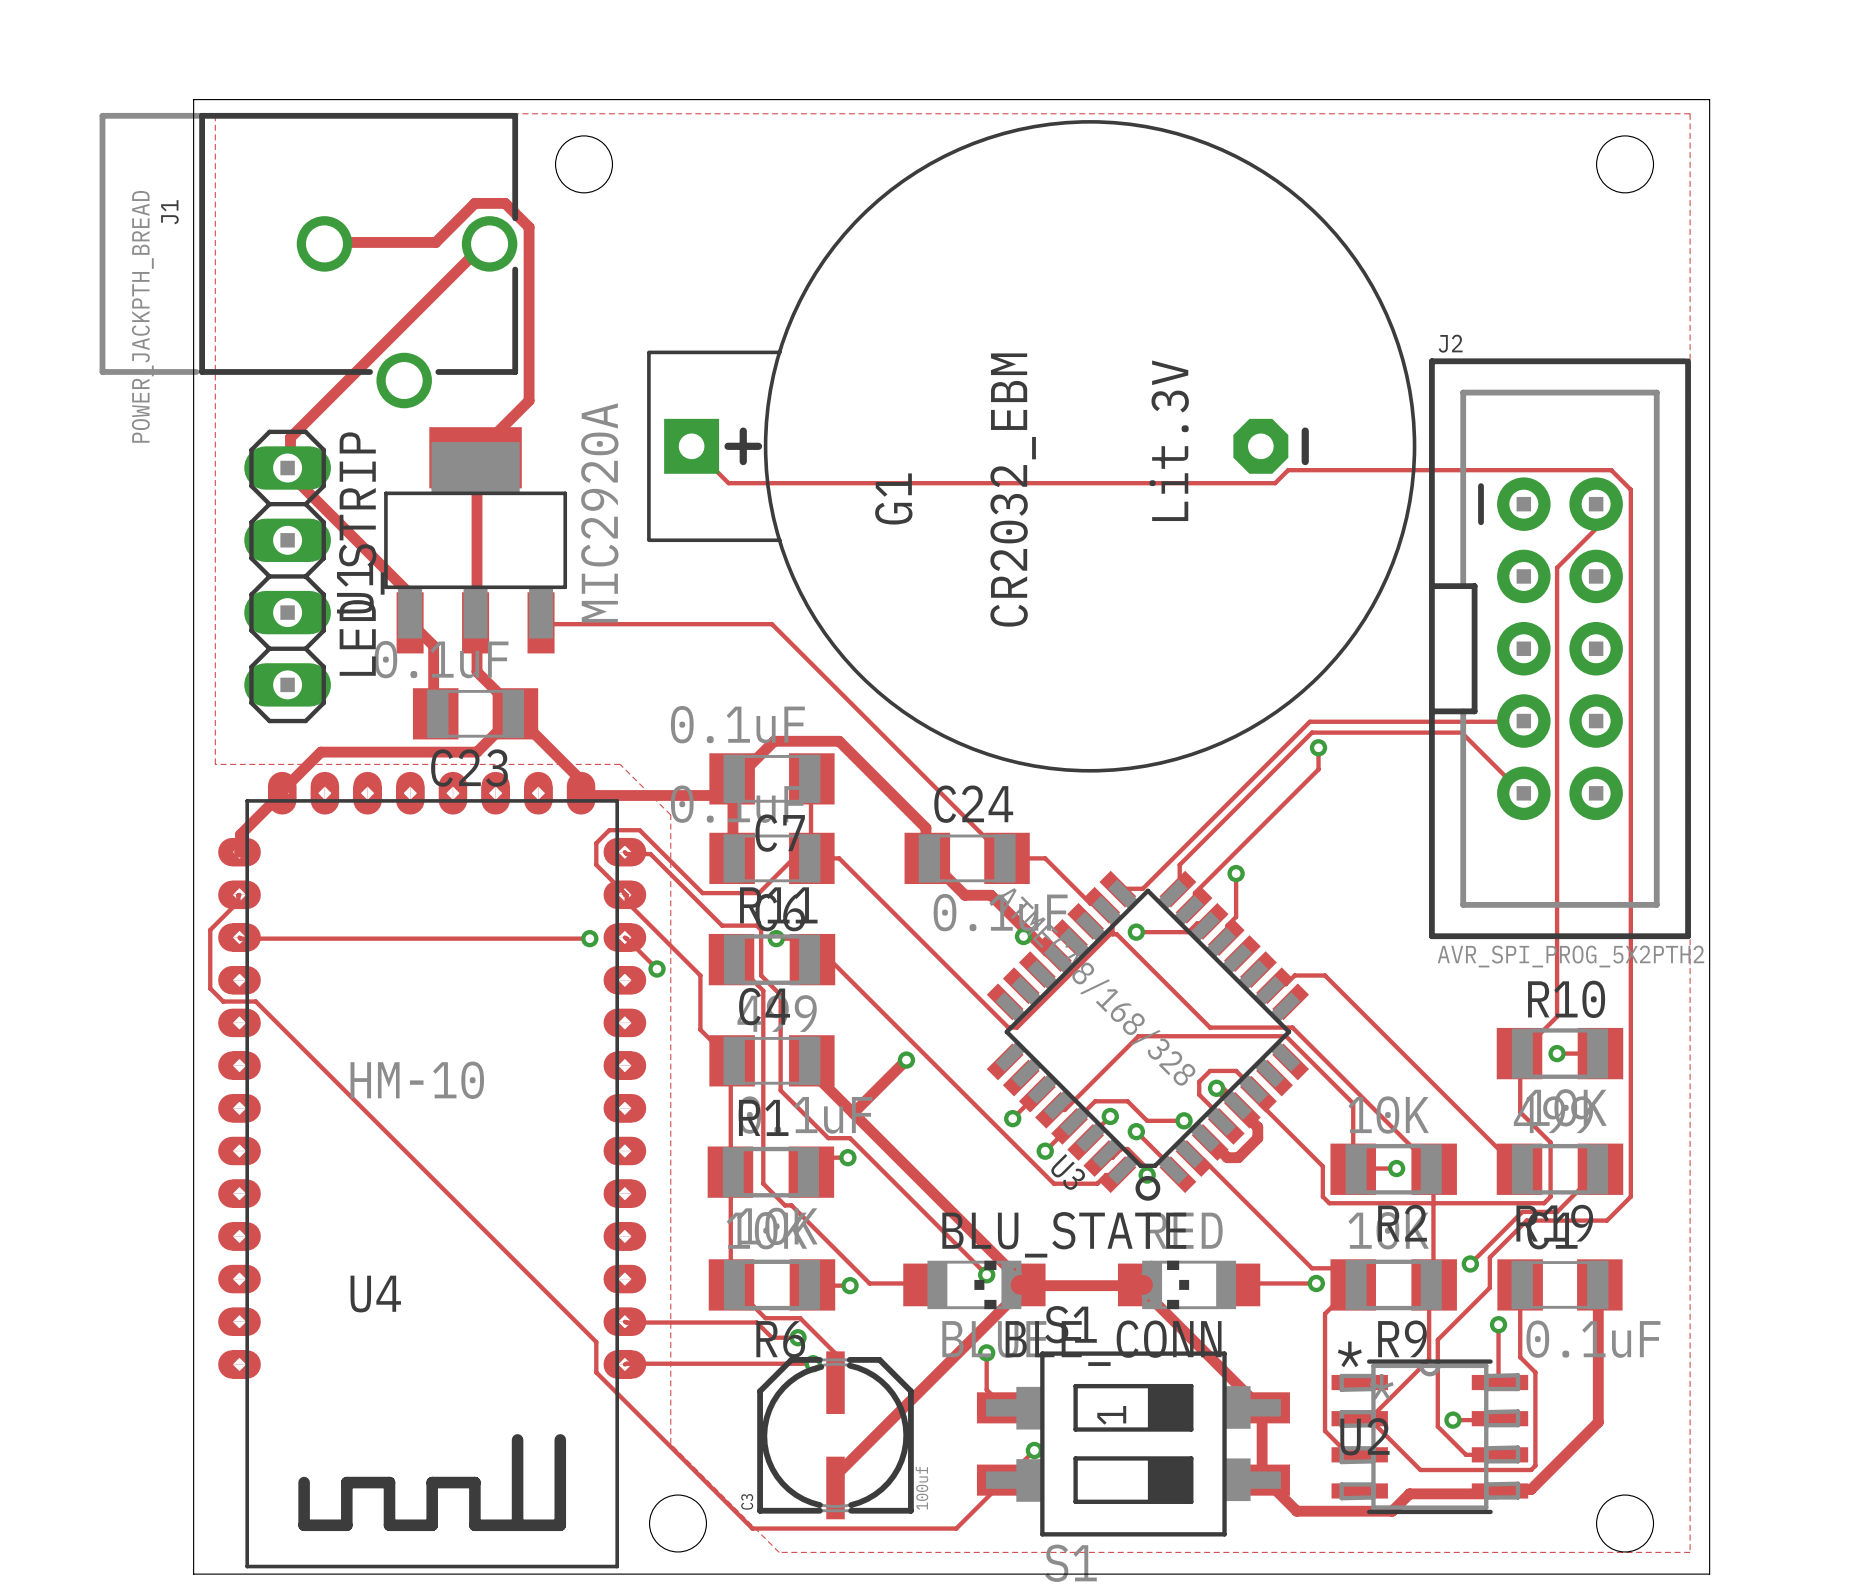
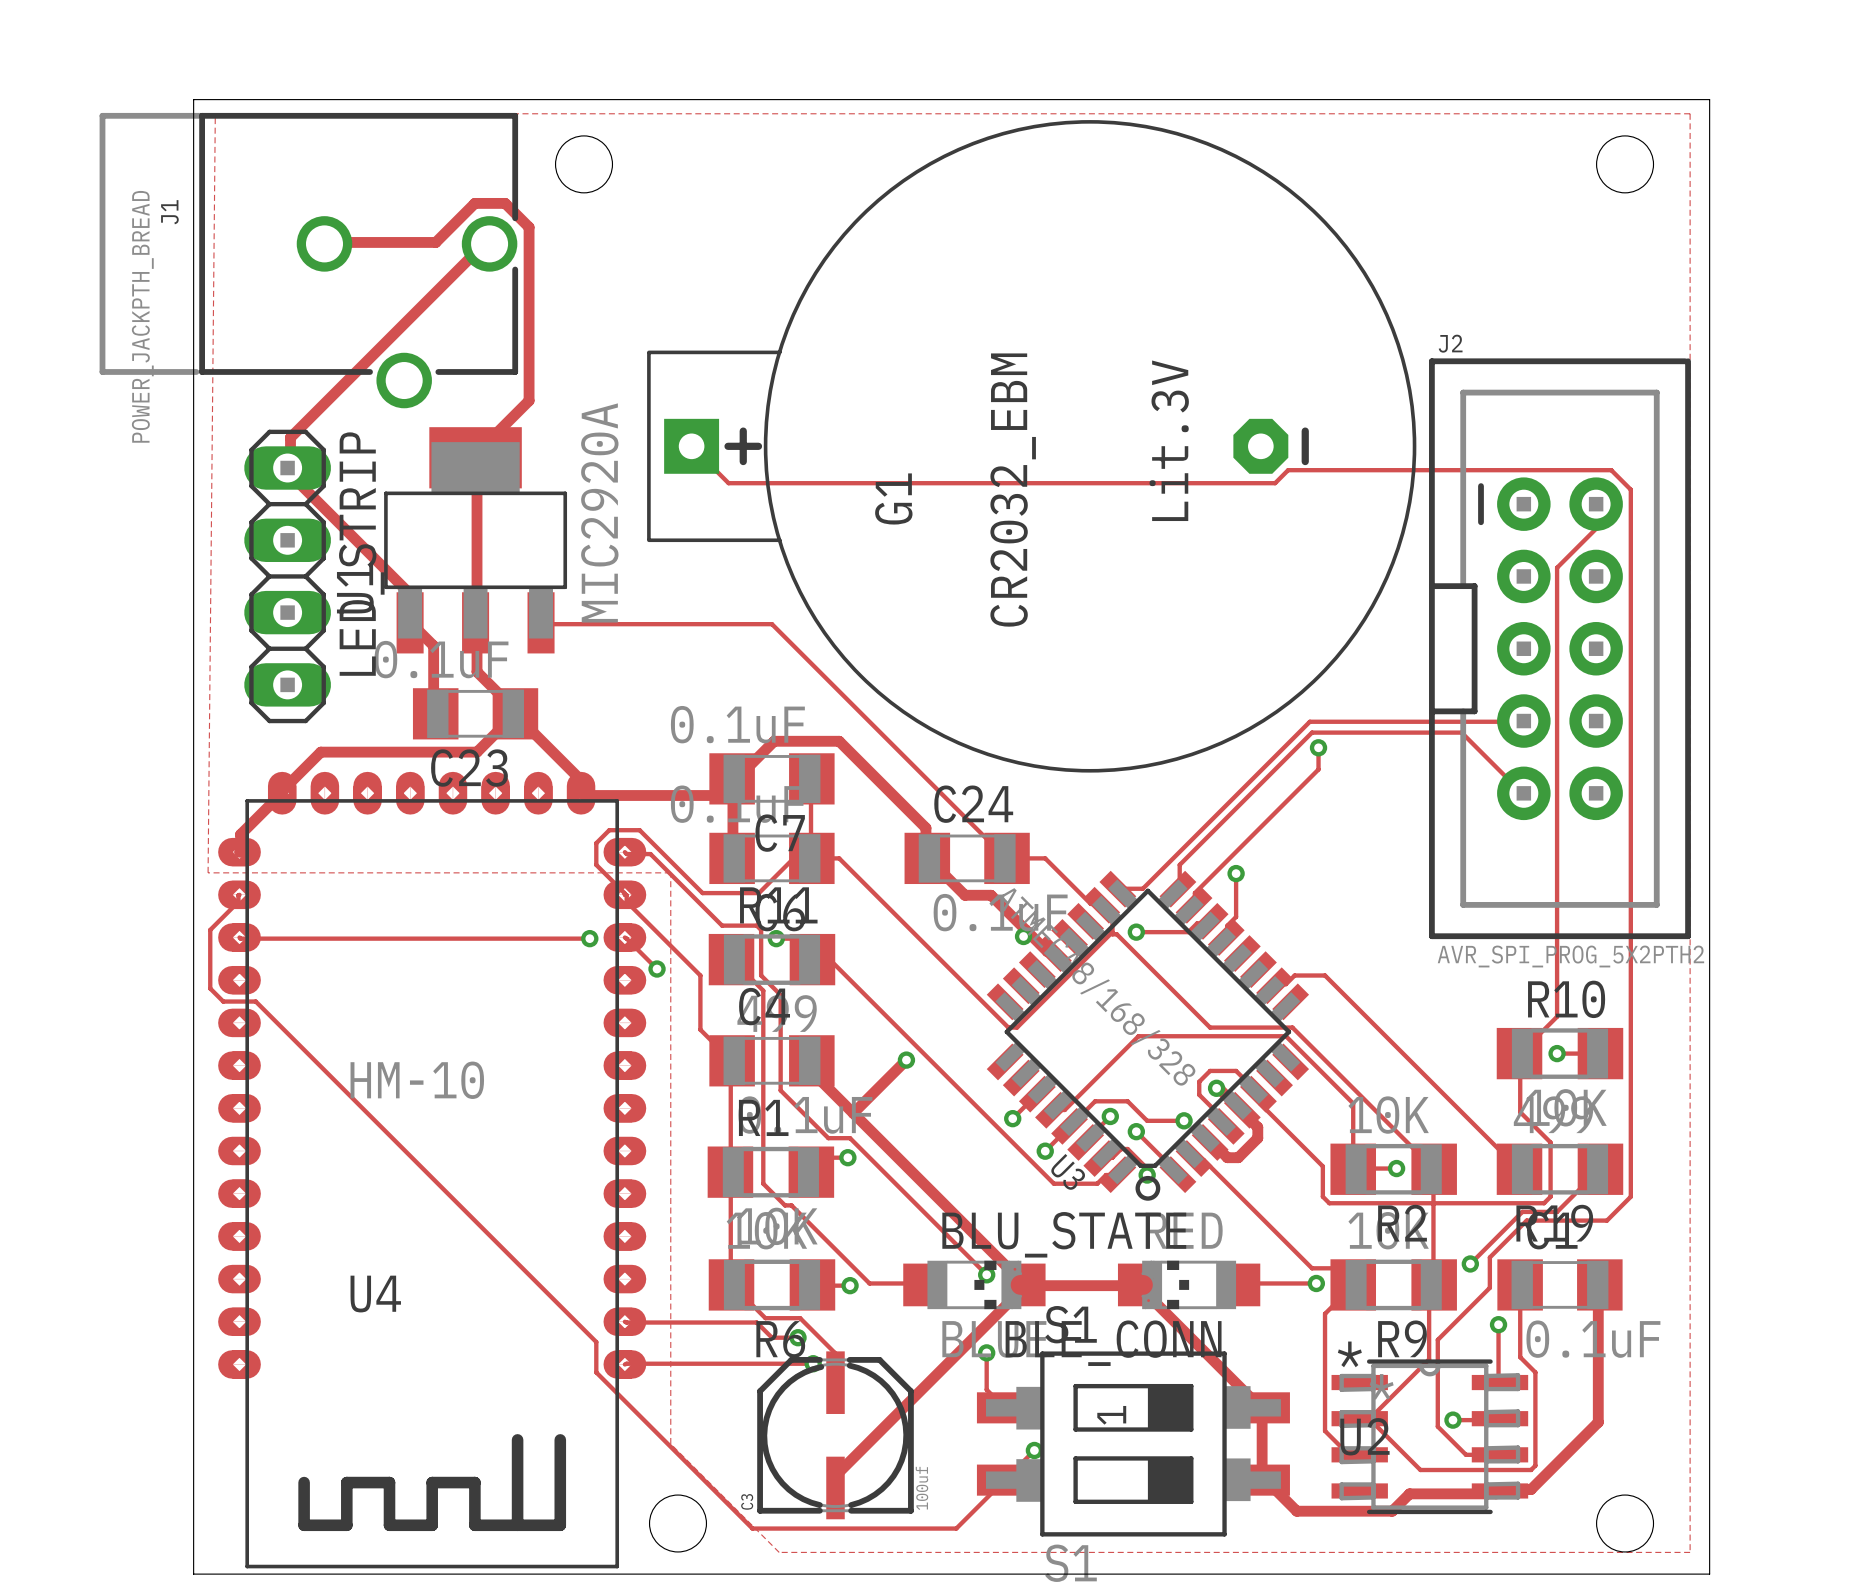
zone outline: (215, 113) (215, 764) (620, 764) (670, 815) (670, 872) -> (215, 113) (208, 872) (670, 872)

